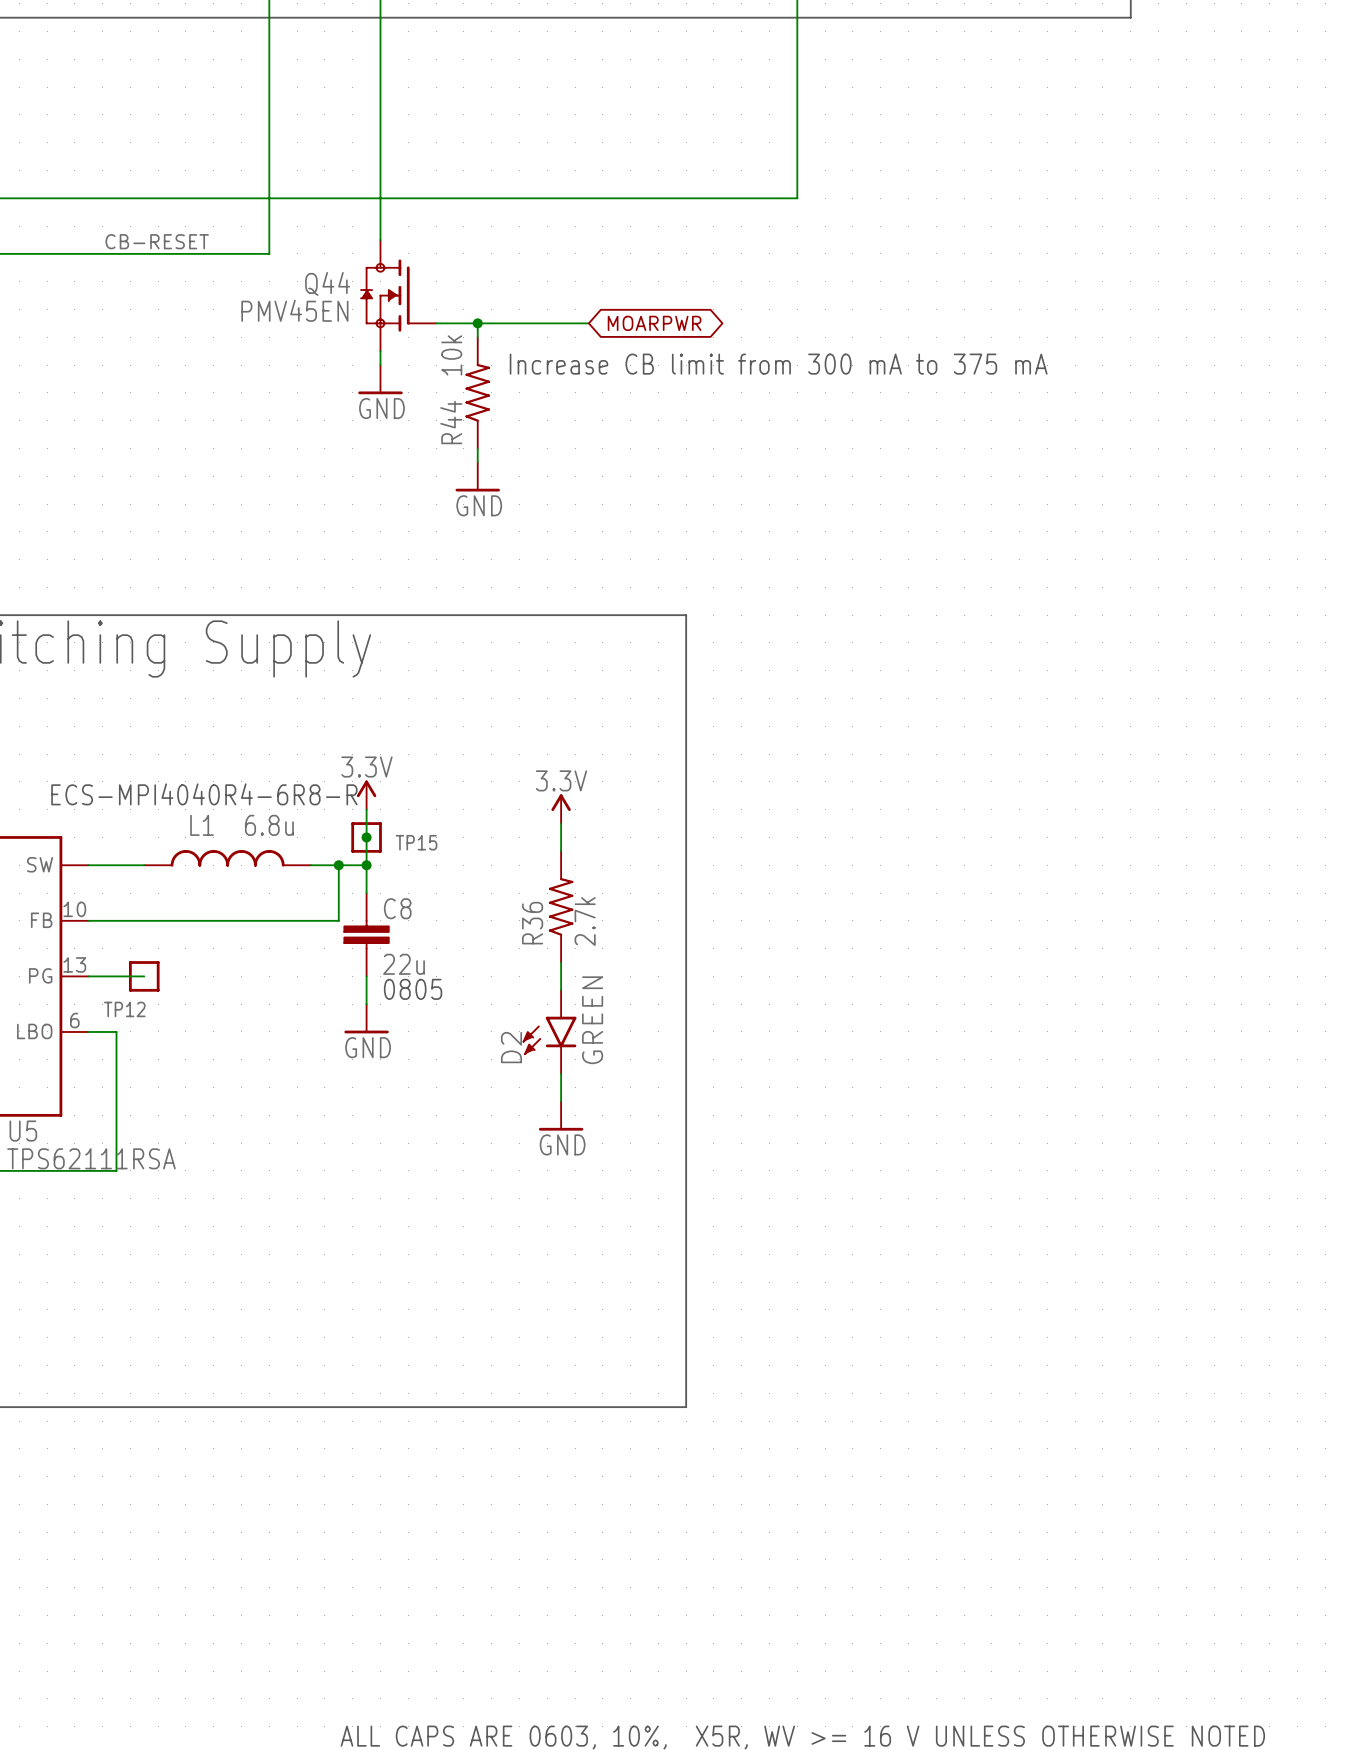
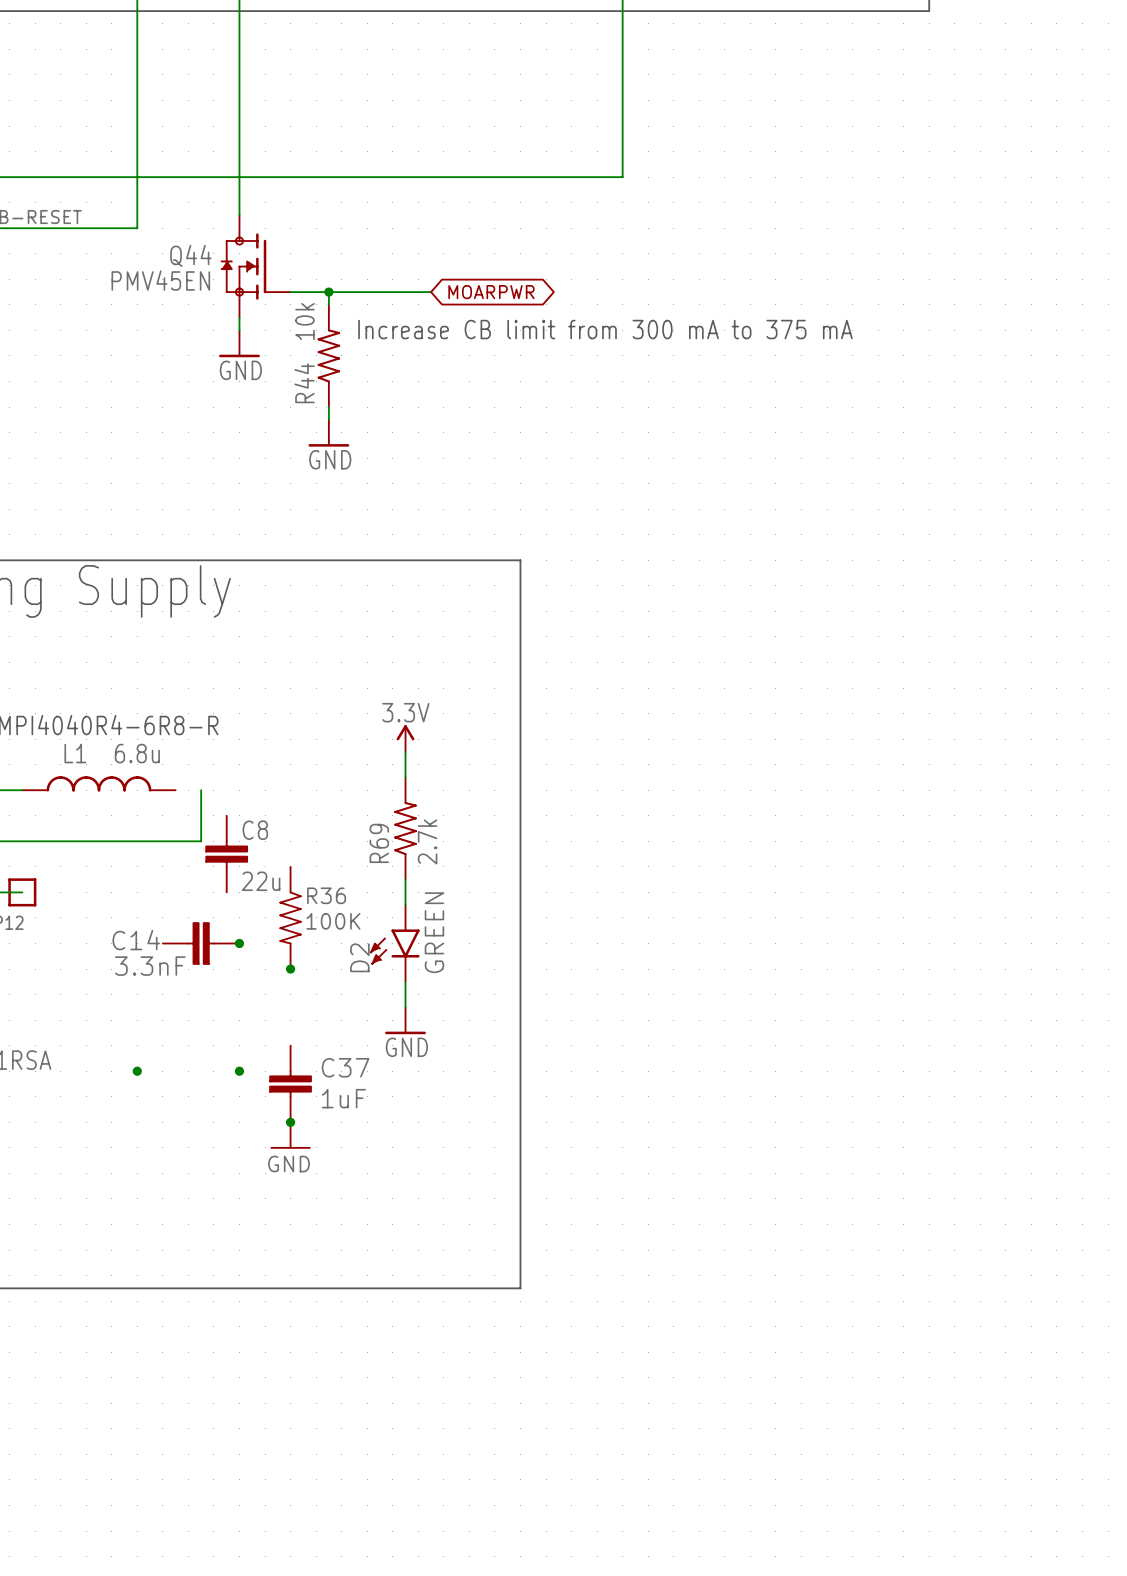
power symbol: 3.3V (366, 795) -> none
wire: (366, 809) (366, 893) -> none
junction: (366, 837) -> none
TP15: (366, 837) -> none
wire: (311, 865) (366, 865) -> none
junction: (338, 865) -> none
junction: (366, 865) -> none
R36 name: R36 (532, 923) -> R69 (379, 843)
wire: (366, 976) (366, 1004) -> none
text: 0805 (413, 989) -> none
R36: none -> 100K (290, 917)
power symbol: GND (366, 1018) -> none
C14: none -> 3.3nF (201, 943)
junction: none -> (239, 943)
junction: none -> (290, 969)
junction: none -> (137, 1071)
junction: none -> (239, 1071)
C37: none -> 1uF (290, 1084)
junction: none -> (290, 1122)
power symbol: none -> GND (290, 1135)

